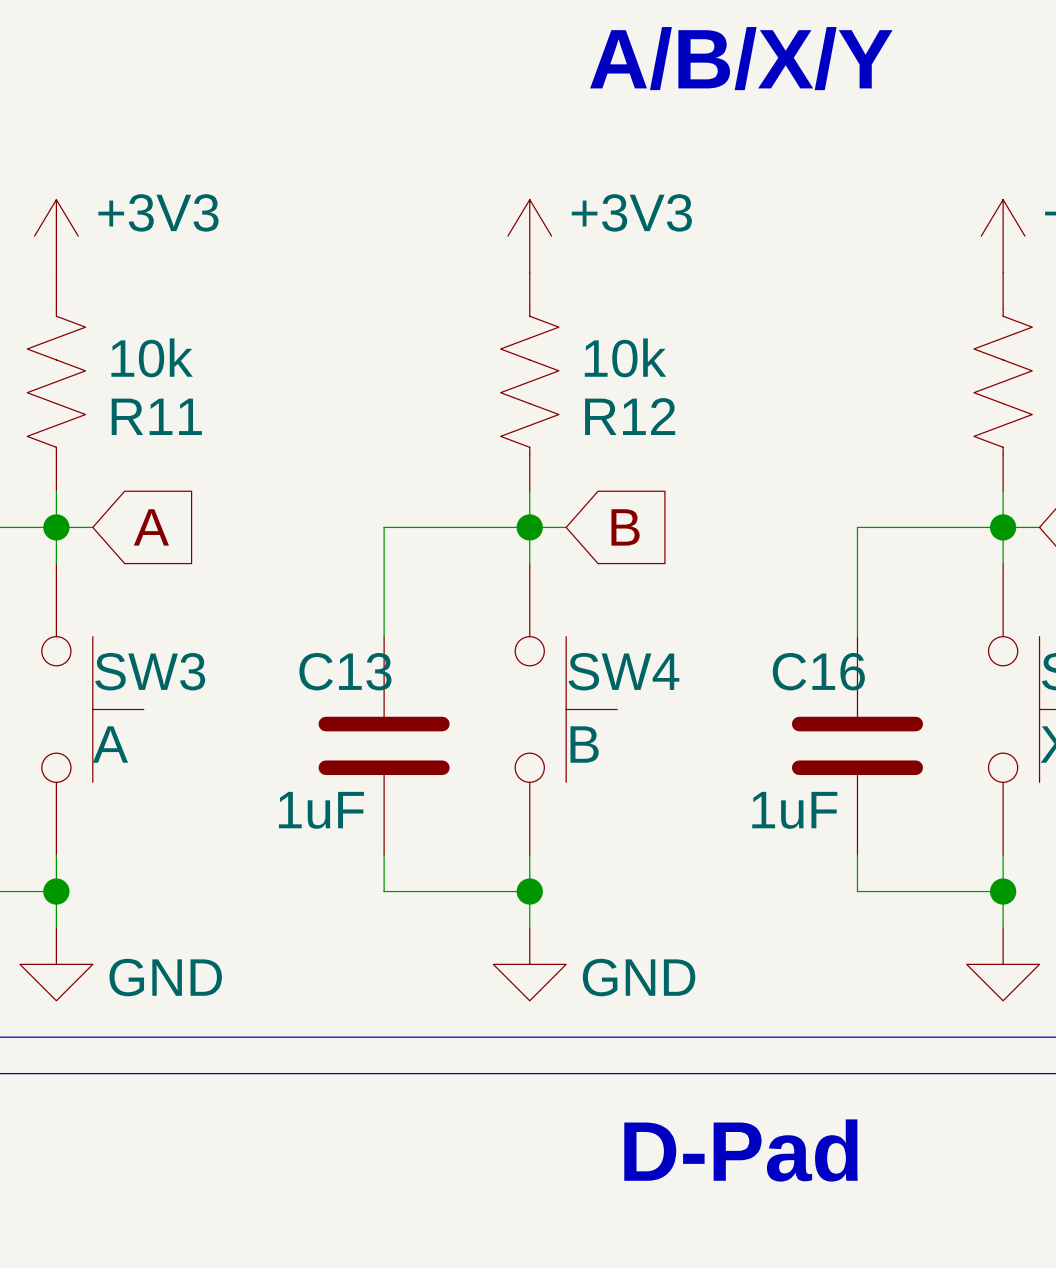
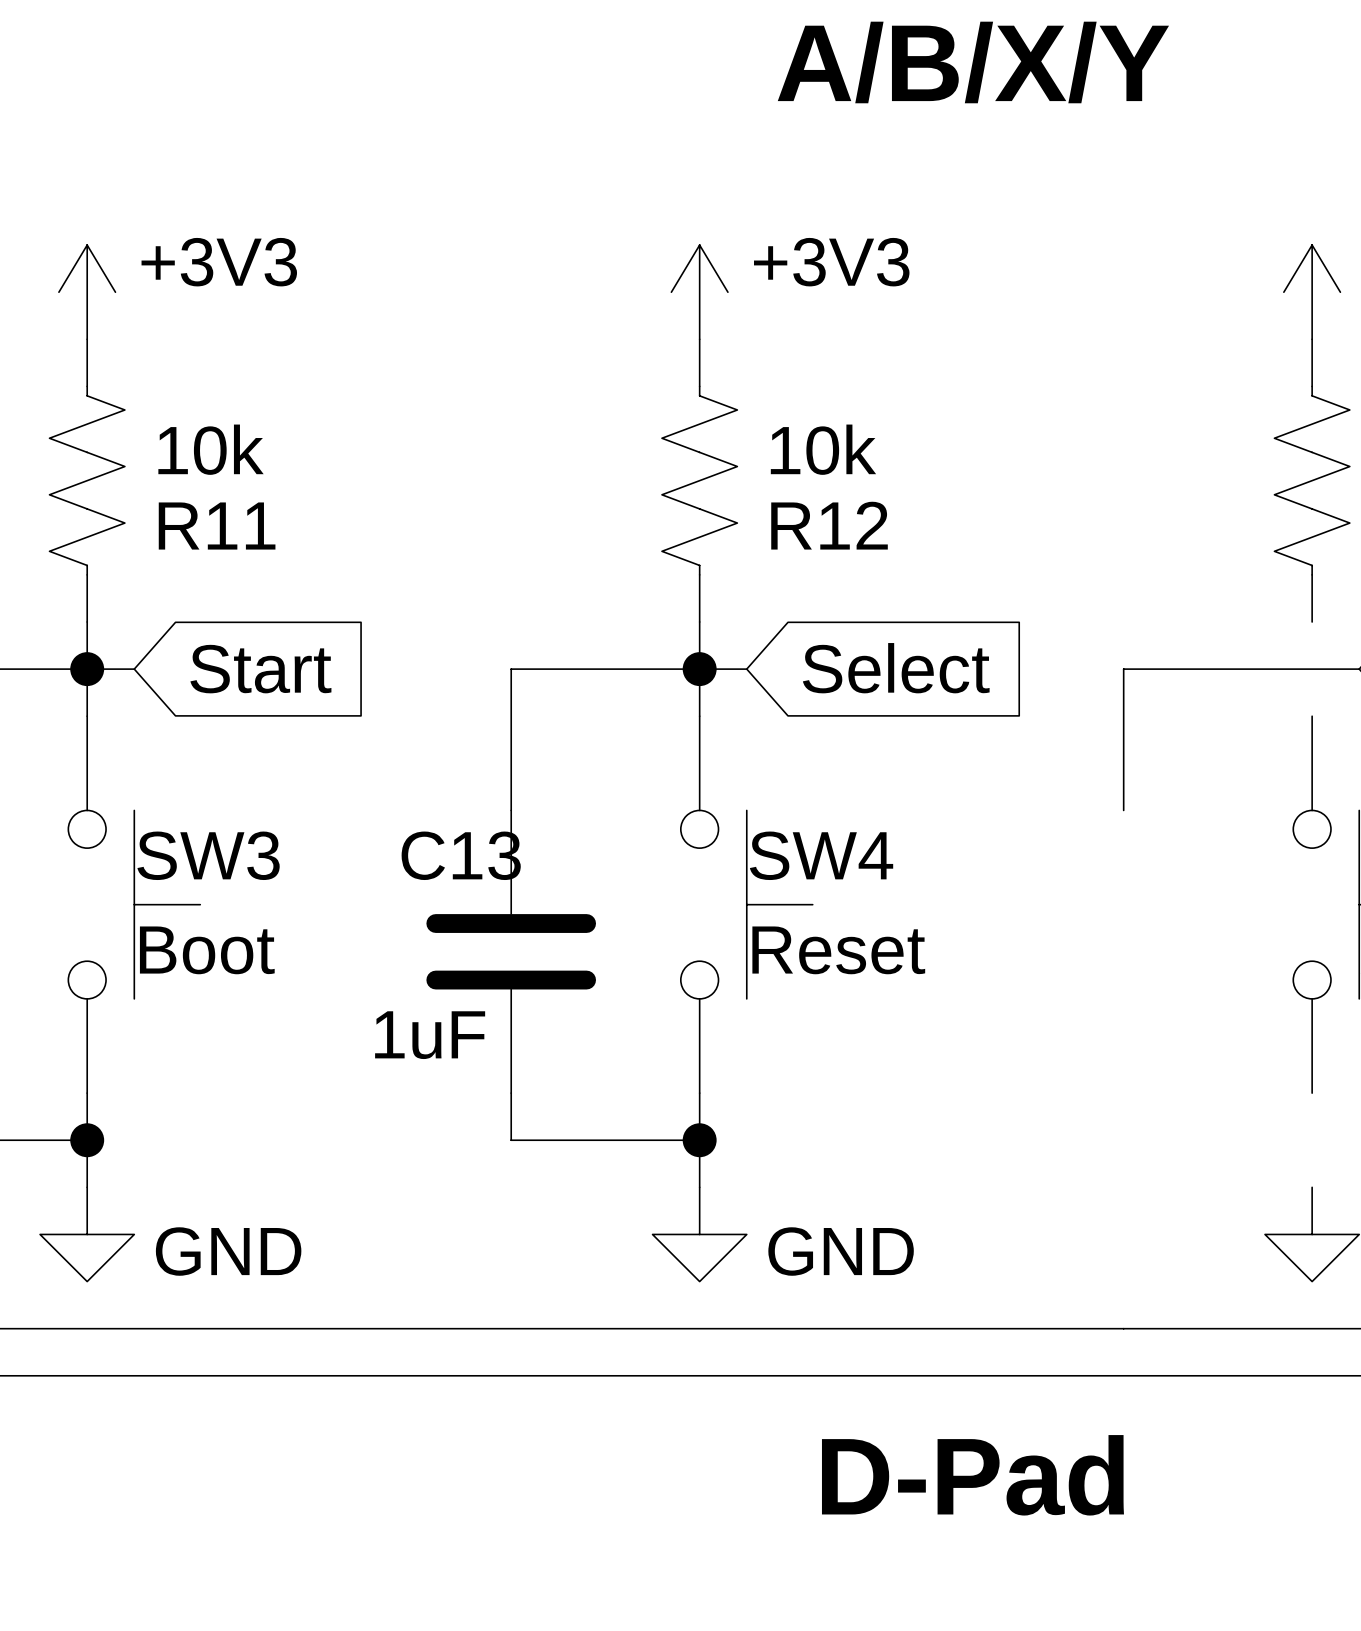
wire: (1003, 491) (1003, 563) -> none
global label: A (151, 527) -> Start (260, 669)
global label: B (625, 527) -> Select (896, 668)
junction: (1003, 527) -> none
SW3 value: A (110, 744) -> Boot (207, 950)
SW4 value: B (584, 744) -> Reset (838, 950)
C16: 1uF (857, 745) -> none
wire: (857, 855) (857, 891) (1003, 891) -> none
wire: (1003, 855) (1003, 927) -> none
junction: (1003, 891) -> none

